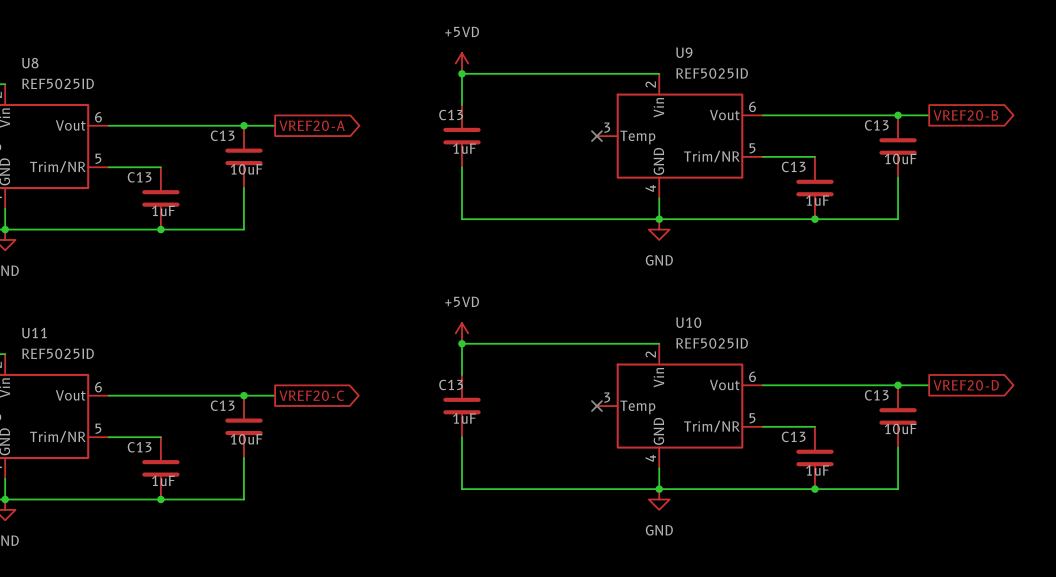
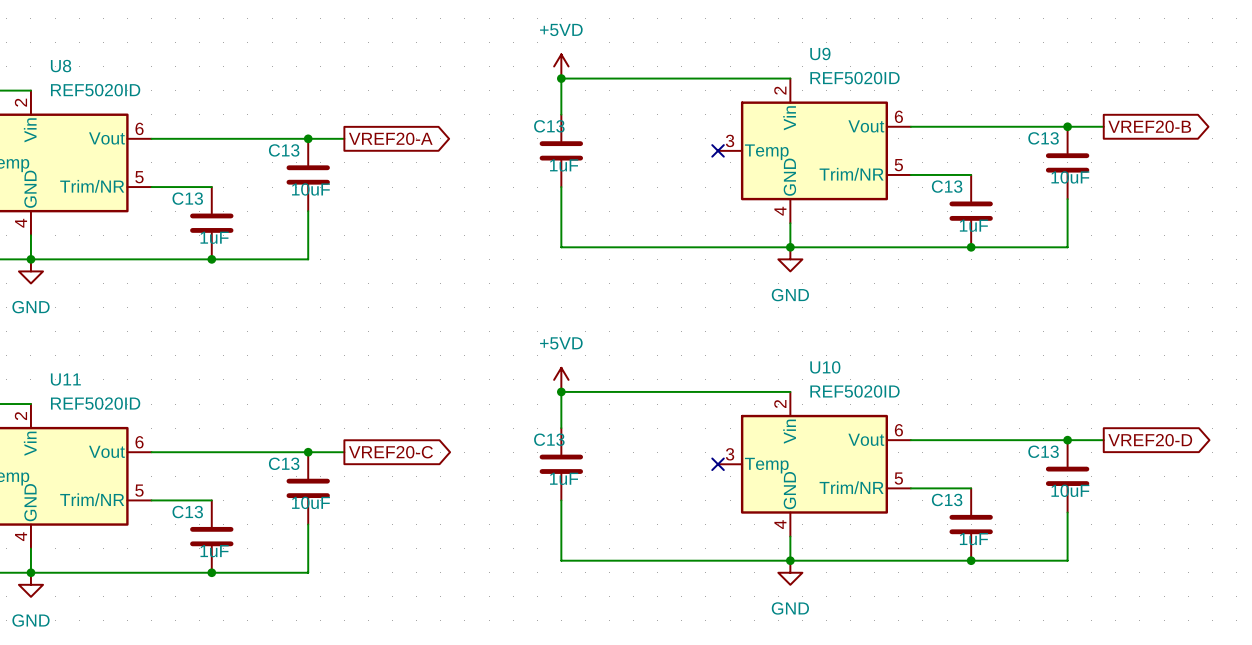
U9 value: REF5025ID (712, 73) -> REF5020ID (854, 78)
U8 value: REF5025ID (58, 83) -> REF5020ID (95, 90)
U10 value: REF5025ID (712, 343) -> REF5020ID (854, 391)
U11 value: REF5025ID (58, 353) -> REF5020ID (95, 403)

